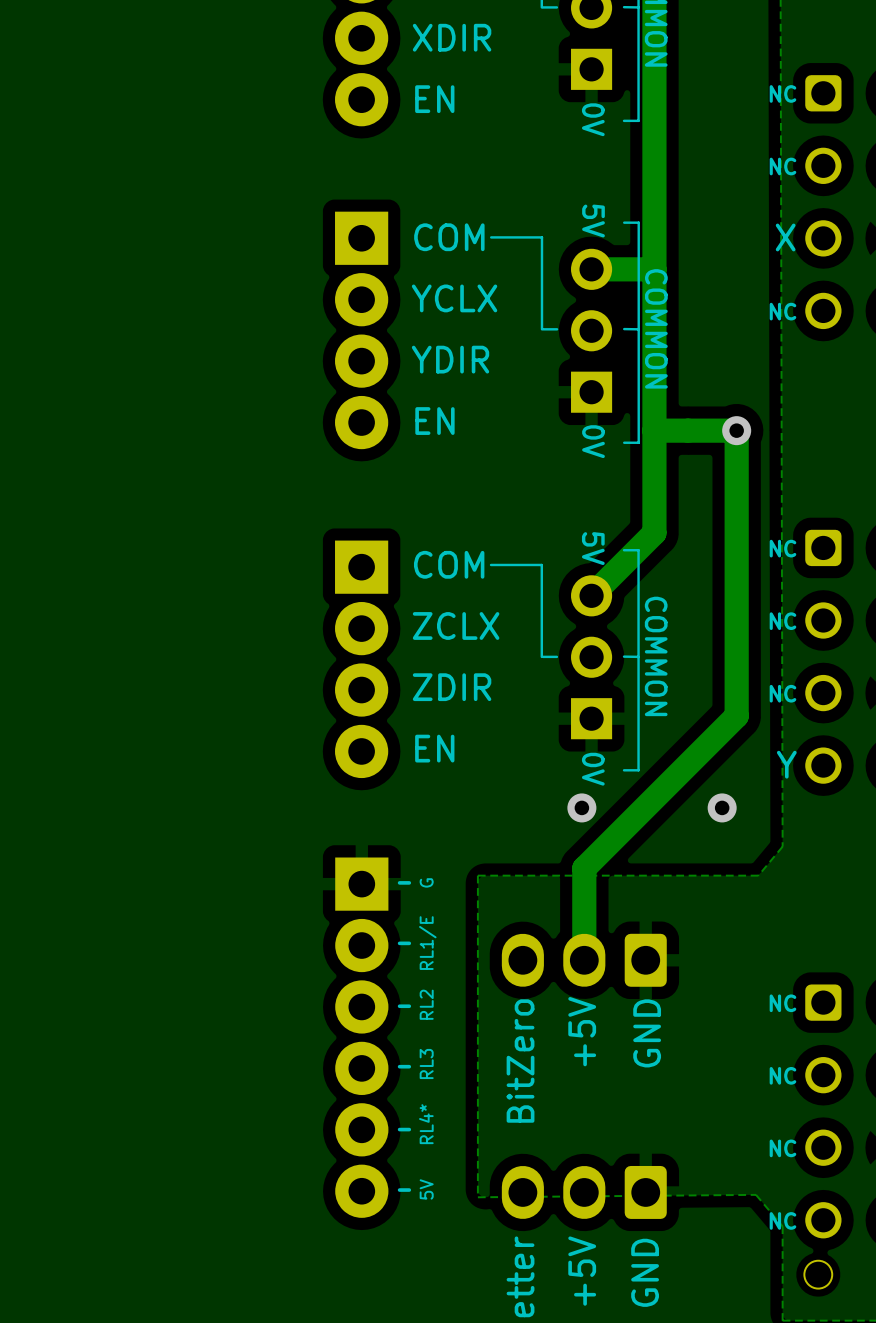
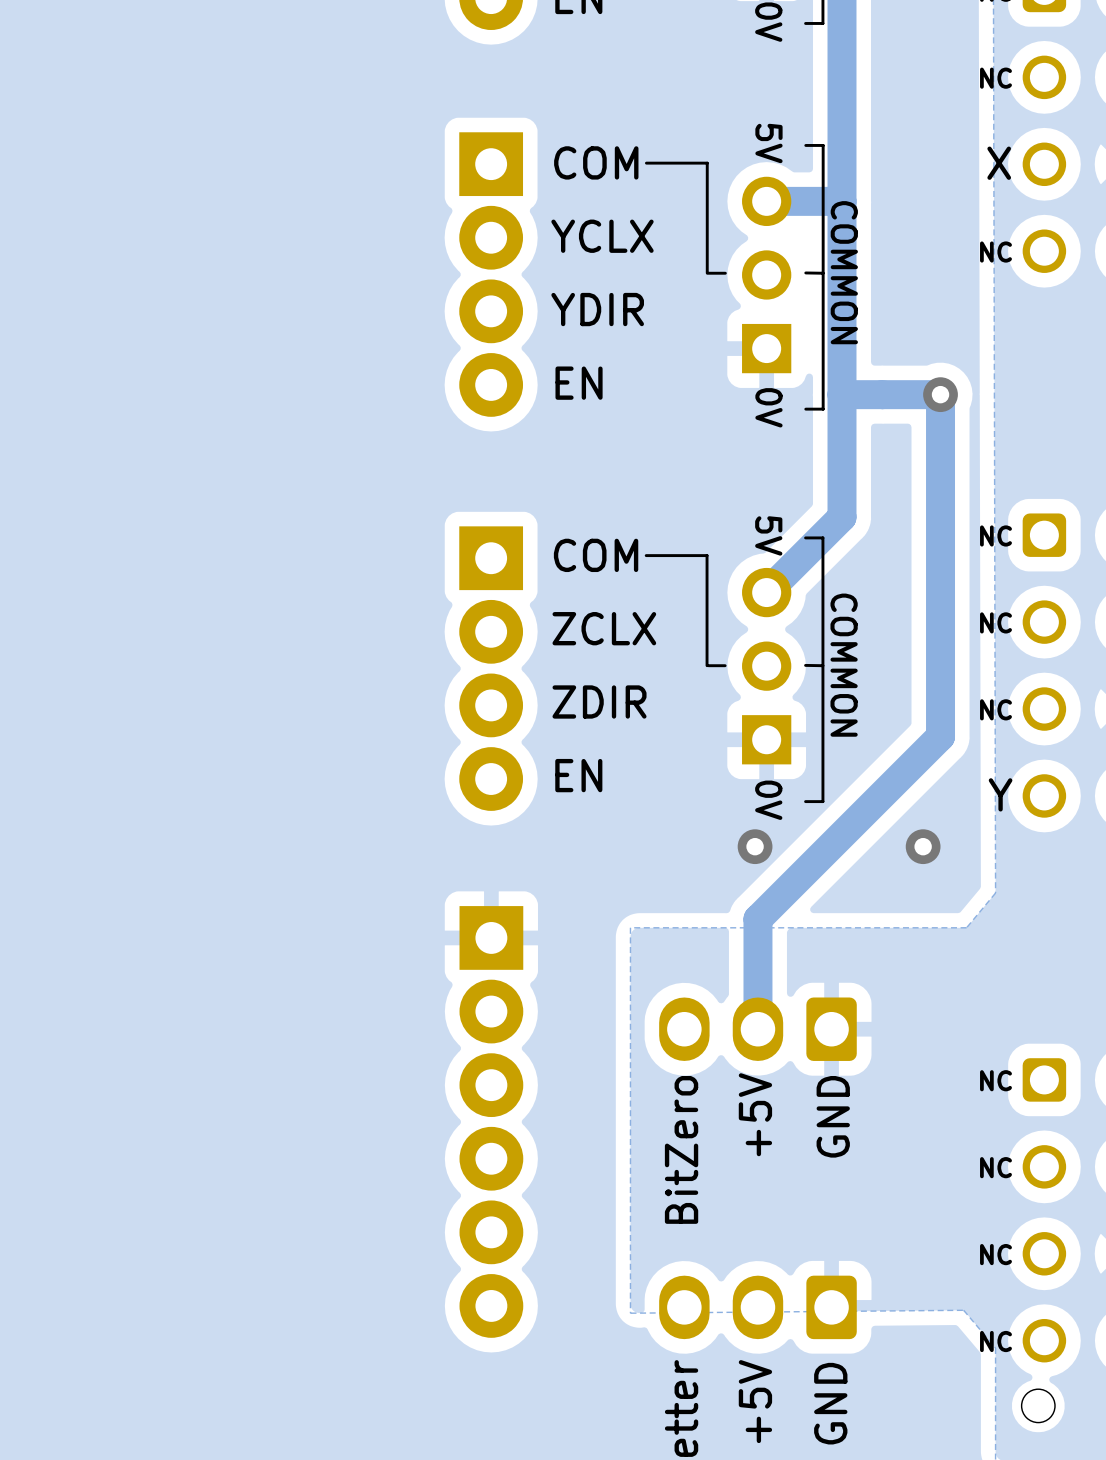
line: (409, 882) (399, 882) -> none
text: G (426, 882) -> none
line: (409, 943) (399, 943) -> none
text: RL1/E (427, 943) -> none
text: RL2 (426, 1004) -> none
line: (409, 1006) (399, 1006) -> none
text: RL3 (426, 1063) -> none
line: (409, 1066) (399, 1066) -> none
text: RL4* (426, 1124) -> none
line: (409, 1129) (399, 1129) -> none
text: 5V (426, 1189) -> none
line: (409, 1190) (399, 1190) -> none

